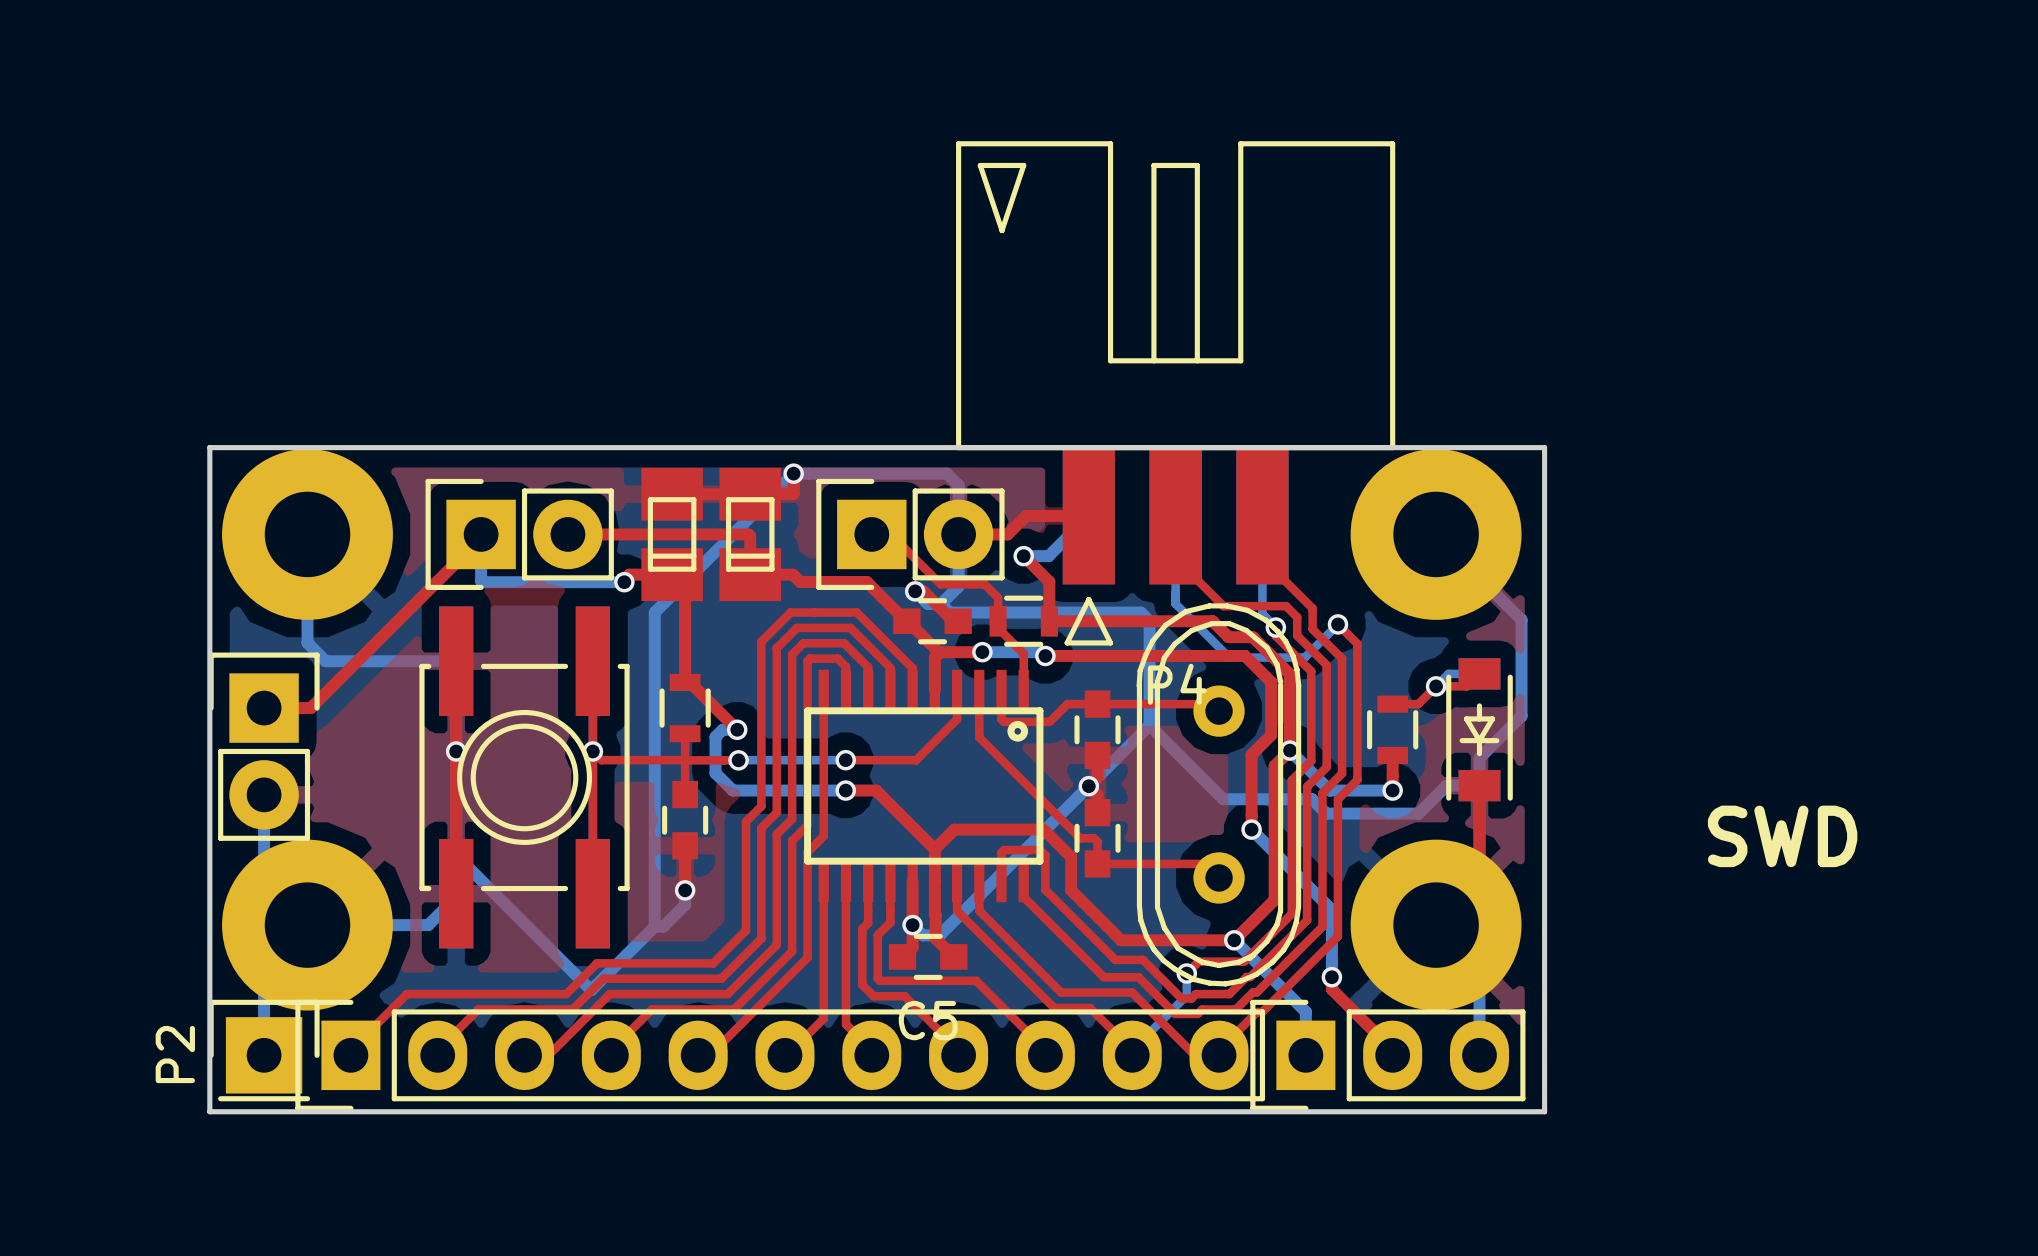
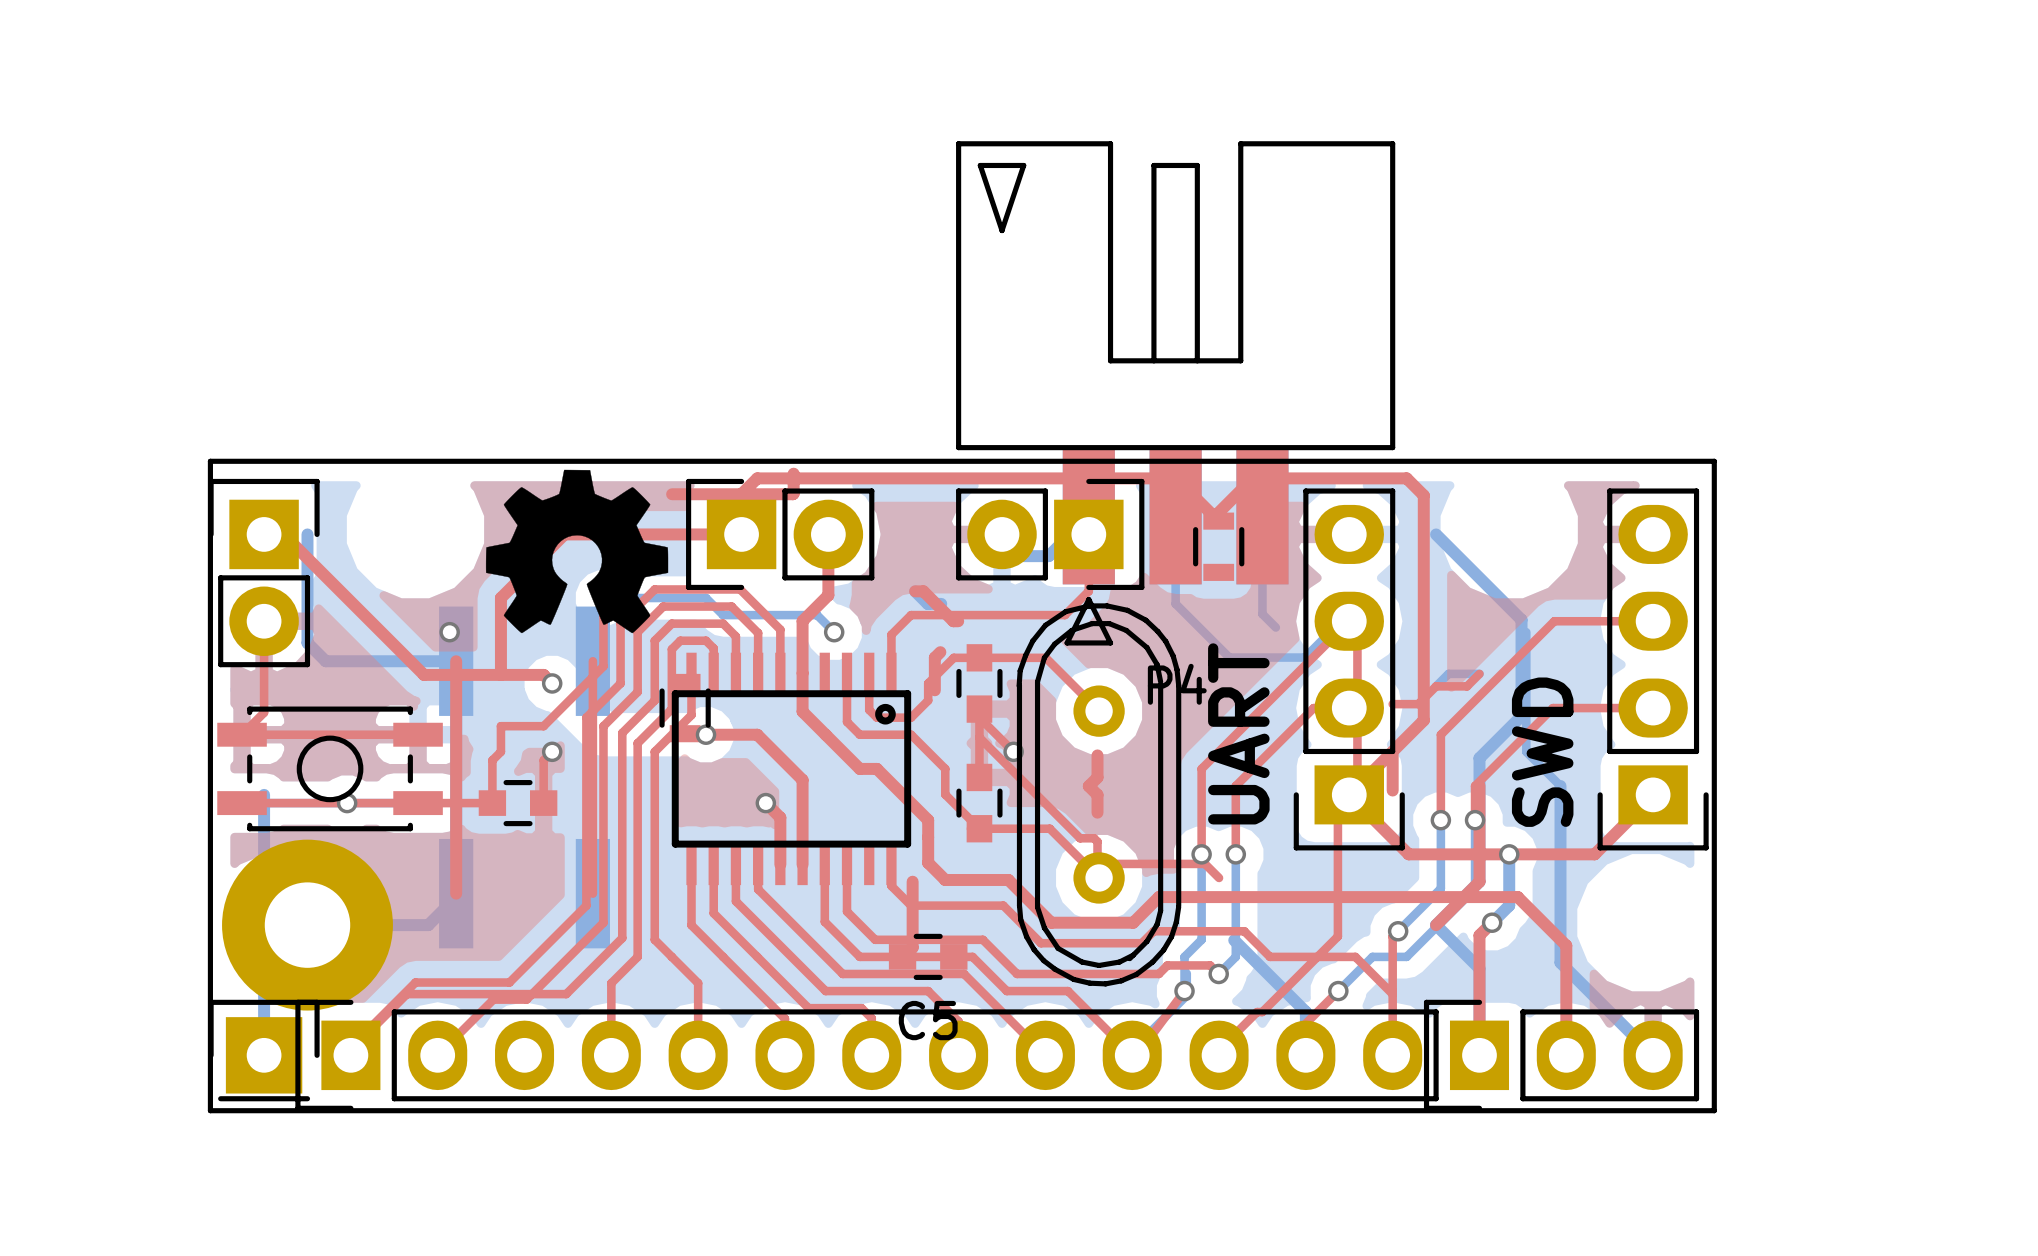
board edge: (209, 447) (1544, 447) (1544, 1111) (209, 1111) (209, 447) -> (210, 461) (210, 1110) (1714, 1110) (1714, 461) (210, 461)
part footprint: [719, 467, 782, 602] -> [686, 478, 875, 590]
drawing: none -> [485, 469, 669, 634]
via: (793, 473) -> none
top track: (1088, 515) (1026, 515) (1007, 534) (958, 534) -> none
top track: (1175, 515) (1175, 558) (1223, 606) (1286, 606) (1297, 617) (1297, 635) (1326, 665) (1326, 767) (1307, 786) (1307, 920) (1250, 977) (1246, 977) (1229, 994) (1195, 994) (1191, 998) (1181, 998) (1142, 959) (1115, 959) (1045, 889) (1045, 855) (1040, 850) (1004, 850) (1001, 852) (1001, 881) -> none
top track: (1262, 515) (1262, 558) (1312, 608) (1312, 629) (1342, 658) (1342, 773) (1322, 793) (1322, 926) (1256, 992) (1252, 992) (1235, 1009) (1202, 1009) (1197, 1013) (1175, 1013) (1138, 977) (1103, 977) (1023, 897) (1023, 881) -> none
top track: none -> (1102, 521) (1088, 534) (1088, 591) (1064, 615) (911, 615) (891, 634) (891, 673)
top track: none -> (264, 534) (283, 534) (424, 674) (543, 674) (552, 683)
part: (307, 534) -> none
top track: (481, 534) (481, 537) (310, 708) (264, 708) -> none
bottom track: (481, 534) (482, 582) (624, 582) -> none
part: (519, 534) -> none
top track: none -> (567, 534) (564, 534) (500, 598) (500, 674)
part: (672, 534) -> none
top track: (741, 534) (750, 536) (750, 574) (792, 574) (800, 581) (866, 581) (938, 652) (982, 652) -> (741, 534) (741, 494) (757, 478) (1175, 478) (1218, 521) (1218, 512) (1252, 478) (1406, 478) (1423, 495) (1423, 720) (1349, 794) (1408, 854) (1594, 854) (1653, 794)
top track: none -> (828, 534) (828, 595) (802, 621) (802, 711) (859, 768) (876, 768) (928, 820) (928, 862) (945, 879) (1008, 879) (1051, 922) (1133, 922) (1158, 897) (1517, 897) (1566, 945) (1566, 1055)
top track: (871, 534) (890, 534) (940, 584) (984, 584) (998, 597) (998, 628) (1023, 653) (1023, 690) -> none
part rotation: 0° (910, 534) -> 180° (1050, 534)
part position: (910, 534) -> (1050, 534)
part: (1436, 534) -> none
part: none -> (1218, 546)
top track: (1023, 556) (1049, 581) (1049, 621) (1212, 621) (1228, 637) (1252, 637) (1289, 674) (1289, 750) (1274, 765) (1274, 899) (1234, 940) (1121, 940) (1071, 890) (1071, 856) (1043, 829) (954, 829) (934, 849) -> none
via: (1023, 556) -> none
part: none -> (264, 573)
top track: (624, 582) (629, 574) (672, 574) (685, 587) (685, 682) (689, 682) (737, 729) -> none
via: (915, 591) -> none
top track: none -> (603, 598) (603, 666) (543, 726) (500, 726) (500, 751) (492, 760) (492, 803) (242, 803)
bottom track: none -> (603, 598) (706, 598) (723, 615) (817, 615) (834, 632)
part footprint: [419, 606, 630, 949] -> [478, 780, 558, 827]
top track: none -> (264, 621) (264, 712) (242, 734) (418, 734)
part: (932, 621) -> none
part: (1023, 621) -> none
top track: none -> (1349, 621) (1201, 768) (1201, 854)
top track: none -> (1653, 621) (1554, 621) (1440, 734) (1440, 820)
via: (1338, 624) -> none
top track: (1275, 627) (1275, 635) (1311, 671) (1311, 760) (1291, 780) (1291, 913) (1244, 961) (1198, 961) (1186, 973) -> none
via: (1275, 627) -> none
via: none -> (449, 632)
via: none -> (834, 632)
bottom track: none -> (1526, 632) (1526, 751) (1560, 786) (1560, 962) (1653, 1055)
bottom track: (982, 652) (1041, 652) (1045, 655) -> none
via: (982, 652) -> none
top track: (1045, 655) (1245, 655) (1271, 682) (1271, 735) (1251, 754) (1251, 829) -> none
via: (1045, 655) -> none
part: none -> (1349, 669)
part: none -> (1653, 669)
top track: none -> (780, 673) (780, 629) (740, 589) (654, 589) (620, 623) (620, 683) (586, 717) (586, 905) (509, 982) (415, 982) (350, 1047) (350, 1050)
top track: none -> (847, 673) (847, 721) (859, 734) (911, 734) (945, 768) (945, 794) (979, 828)
top track: none -> (869, 673) (869, 709) (876, 717) (911, 717) (928, 700) (928, 683) (953, 657) (1045, 657) (1099, 711)
via: none -> (552, 683)
part: none -> (979, 683)
via: (1436, 686) -> none
top track: (823, 690) (823, 836) (807, 852) (807, 957) (709, 1055) (698, 1055) -> (691, 673) (691, 715) (654, 751) (654, 939) (698, 983) (698, 1055)
top track: (845, 690) (845, 666) (837, 658) (809, 658) (807, 660) (807, 825) (792, 840) (792, 951) (734, 1009) (651, 1009) (611, 1050) -> (713, 673) (713, 648) (706, 640) (680, 640) (671, 649) (671, 709) (637, 743) (637, 956) (611, 983) (611, 1050)
top track: (868, 690) (868, 667) (844, 643) (803, 643) (792, 654) (792, 819) (776, 834) (776, 945) (727, 994) (609, 994) (548, 1055) (524, 1055) -> none
top track: (890, 690) (890, 667) (850, 627) (797, 627) (776, 648) (776, 812) (761, 828) (761, 938) (721, 978) (603, 978) (572, 1009) (478, 1009) (437, 1050) (437, 1055) -> (758, 673) (758, 633) (731, 606) (663, 606) (637, 632) (637, 692) (603, 726) (603, 922) (526, 999) (493, 999) (437, 1055)
top track: (912, 690) (912, 668) (856, 612) (790, 612) (761, 641) (761, 806) (746, 821) (746, 930) (713, 963) (597, 963) -> (735, 673) (735, 636) (723, 623) (671, 623) (654, 640) (654, 700) (622, 733) (622, 938) (597, 963)
top track: (957, 690) (957, 719) (916, 760) -> none
top track: (1001, 690) (1001, 719) (1004, 721) (1049, 721) (1067, 704) (1212, 704) (1219, 711) -> none
top track: none -> (1349, 708) (1313, 708) (1235, 786) (1235, 854)
top track: none -> (1653, 708) (1552, 708) (1475, 786) (1475, 820)
top track: none -> (979, 717) (1013, 751)
bottom track: (1149, 725) (1223, 799) (1311, 799) (1326, 813) (1418, 813) (1446, 785) (1479, 785) -> none
bottom track: (1149, 725) (1149, 621) (1140, 612) (949, 612) (941, 603) (958, 586) (958, 485) (946, 473) (793, 473) (654, 612) (654, 926) -> none
bottom track: (1149, 725) (939, 935) (922, 935) (912, 925) -> none
bottom track: (737, 729) (722, 729) (715, 736) (715, 773) (732, 790) (845, 790) -> none
via: (737, 729) -> none
part: (1097, 729) -> none
part: (1392, 729) -> none
part: (1479, 729) -> none
top track: (685, 733) (685, 794) -> none
text: none -> UART (1238, 733)
top track: none -> (706, 734) (757, 734) (802, 780) (802, 864)
via: none -> (706, 734)
part: (264, 746) -> none
bottom track: (1289, 750) (1329, 790) (1392, 790) -> none
via: (1289, 750) -> none
via: (456, 751) -> none
top track: none -> (552, 751) (543, 760) (543, 803)
via: none -> (552, 751)
top track: (592, 751) (601, 760) (685, 760) -> none
via: (592, 751) -> none
via: none -> (1013, 751)
top track: (685, 760) (738, 760) -> none
bottom track: (738, 760) (845, 760) -> none
via: (738, 760) -> none
top track: (845, 760) (915, 760) -> none
via: (845, 760) -> none
part: none -> (330, 768)
part position: (923, 786) -> (791, 768)
via: (1088, 786) -> none
top track: (845, 790) (876, 790) (934, 849) -> none
via: (845, 790) -> none
via: (1392, 790) -> none
part position: (1218, 794) -> (1098, 794)
via: none -> (347, 803)
top track: none -> (765, 803) (780, 817) (780, 864)
via: none -> (765, 803)
part: none -> (979, 803)
part: (685, 820) -> none
bottom track: none -> (1440, 820) (1440, 888) (1398, 931)
via: none -> (1440, 820)
bottom track: none -> (1475, 820) (1475, 888) (1406, 956) (1372, 956) (1338, 991)
via: none -> (1475, 820)
top track: none -> (970, 828) (1049, 828) (1099, 877)
bottom track: (1251, 829) (1331, 909) (1331, 977) -> none
via: (1251, 829) -> none
text rotation: 0° (1782, 836) -> 90° counterclockwise (1542, 752)
text position: SWD (1782, 836) -> SWD (1542, 752)
part: (1097, 838) -> none
top track: (685, 845) (685, 890) -> none
top track: (934, 849) (935, 938) (953, 956) -> none
bottom track: none -> (1201, 854) (1201, 939) (1184, 956) (1184, 991)
via: none -> (1201, 854)
bottom track: none -> (1235, 854) (1235, 956) (1218, 973)
via: none -> (1235, 854)
bottom track: none -> (1509, 854) (1509, 905) (1492, 922)
via: none -> (1509, 854)
bottom track: (456, 855) (591, 990) (654, 926) -> none
top track: none -> (691, 864) (691, 925) (784, 1018) (784, 1050)
top track: none -> (847, 864) (847, 911) (875, 939) (982, 939) (1017, 973) (1158, 973) (1167, 965) (1210, 965) (1218, 973)
top track: none -> (891, 864) (891, 885) (911, 905) (1003, 905) (1040, 943) (1141, 943) (1153, 931) (1244, 931) (1269, 956) (1355, 956) (1392, 994)
top track: (823, 881) (823, 1018) (784, 1055) -> none
top track: (845, 881) (845, 1024) (871, 1050) -> (713, 864) (713, 913) (808, 1008) (861, 1008) (871, 1018) (871, 1050)
top track: (868, 881) (868, 923) (862, 928) (862, 984) (873, 996) (904, 996) (958, 1050) -> (735, 864) (735, 901) (825, 991) (928, 991) (958, 1021) (958, 1050)
top track: (890, 881) (890, 922) (877, 935) (877, 978) (879, 980) (976, 980) (1045, 1050) (1045, 1055) -> (758, 864) (758, 889) (842, 973) (964, 973) (1045, 1055)
top track: (957, 881) (957, 910) (1054, 1007) (1090, 1007) (1132, 1050) (1132, 1055) -> (824, 864) (824, 921) (859, 956) (972, 956) (1006, 991) (1067, 991) (1132, 1055)
top track: (979, 881) (979, 910) (1061, 992) (1132, 992) (1194, 1055) (1219, 1055) -> none
bottom track: (685, 890) (685, 904) (663, 926) (654, 926) -> none
via: (685, 890) -> none
top track: none -> (1492, 922) (1479, 935) (1479, 1055)
via: none -> (1492, 922)
via: (912, 925) -> none
part: (1436, 925) -> none
via: none -> (1398, 931)
via: (1234, 940) -> none
via position: (1186, 973) -> (1184, 991)
via: none -> (1218, 973)
top track: (1331, 977) (1331, 989) (1392, 1050) -> (1398, 931) (1392, 936) (1392, 1050)
via position: (1331, 977) -> (1338, 991)
top track: none -> (1184, 991) (1150, 1037)
top track: none -> (1338, 991) (1305, 1023)
P2: (780, 1055) -> none
part: none -> (867, 1055)
part position: (1387, 1055) -> (1561, 1055)

